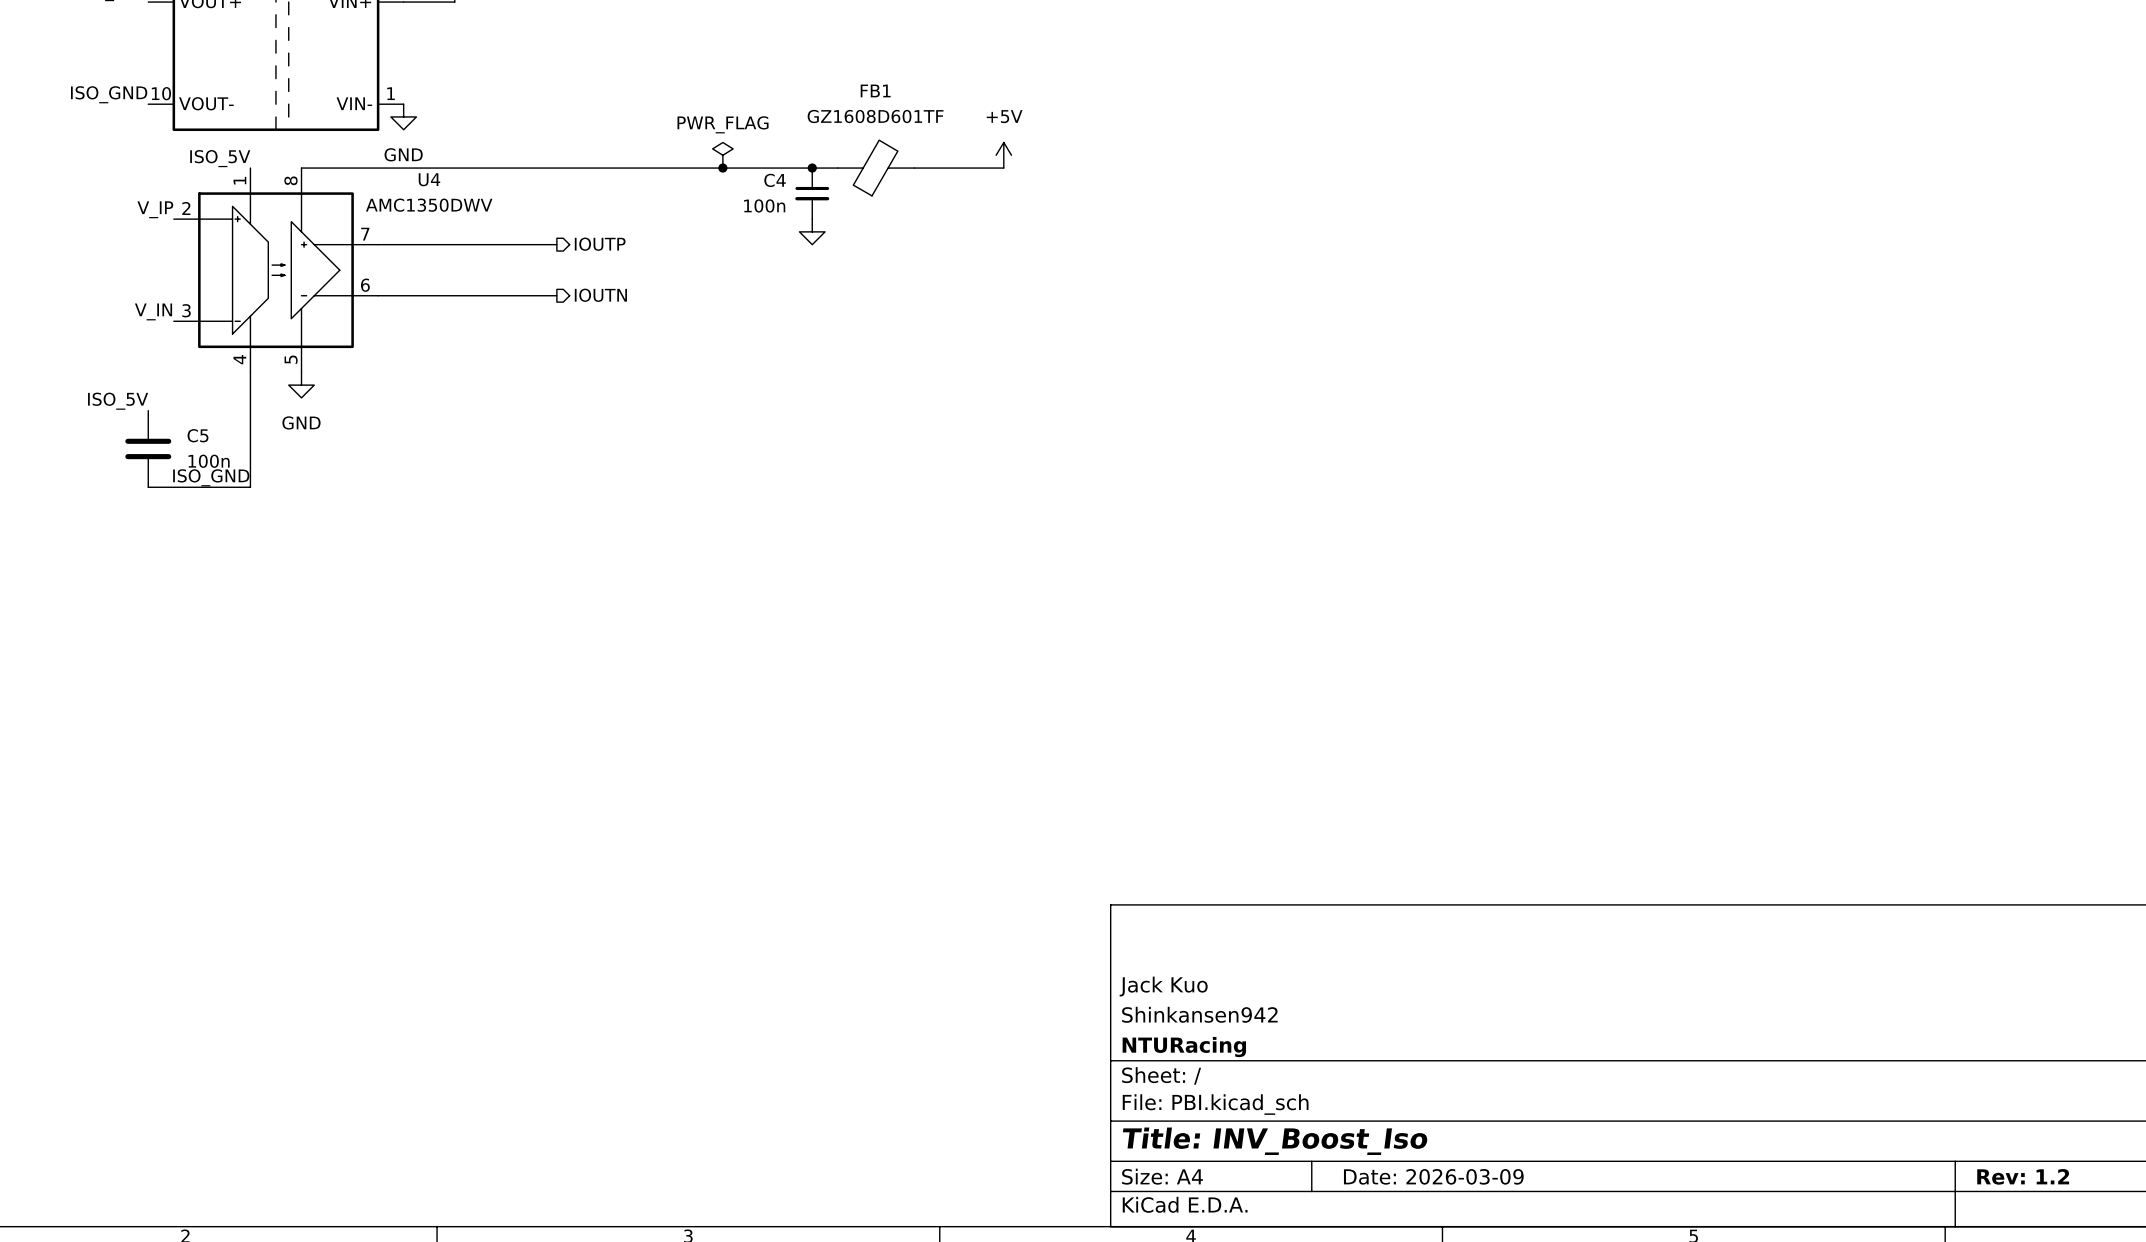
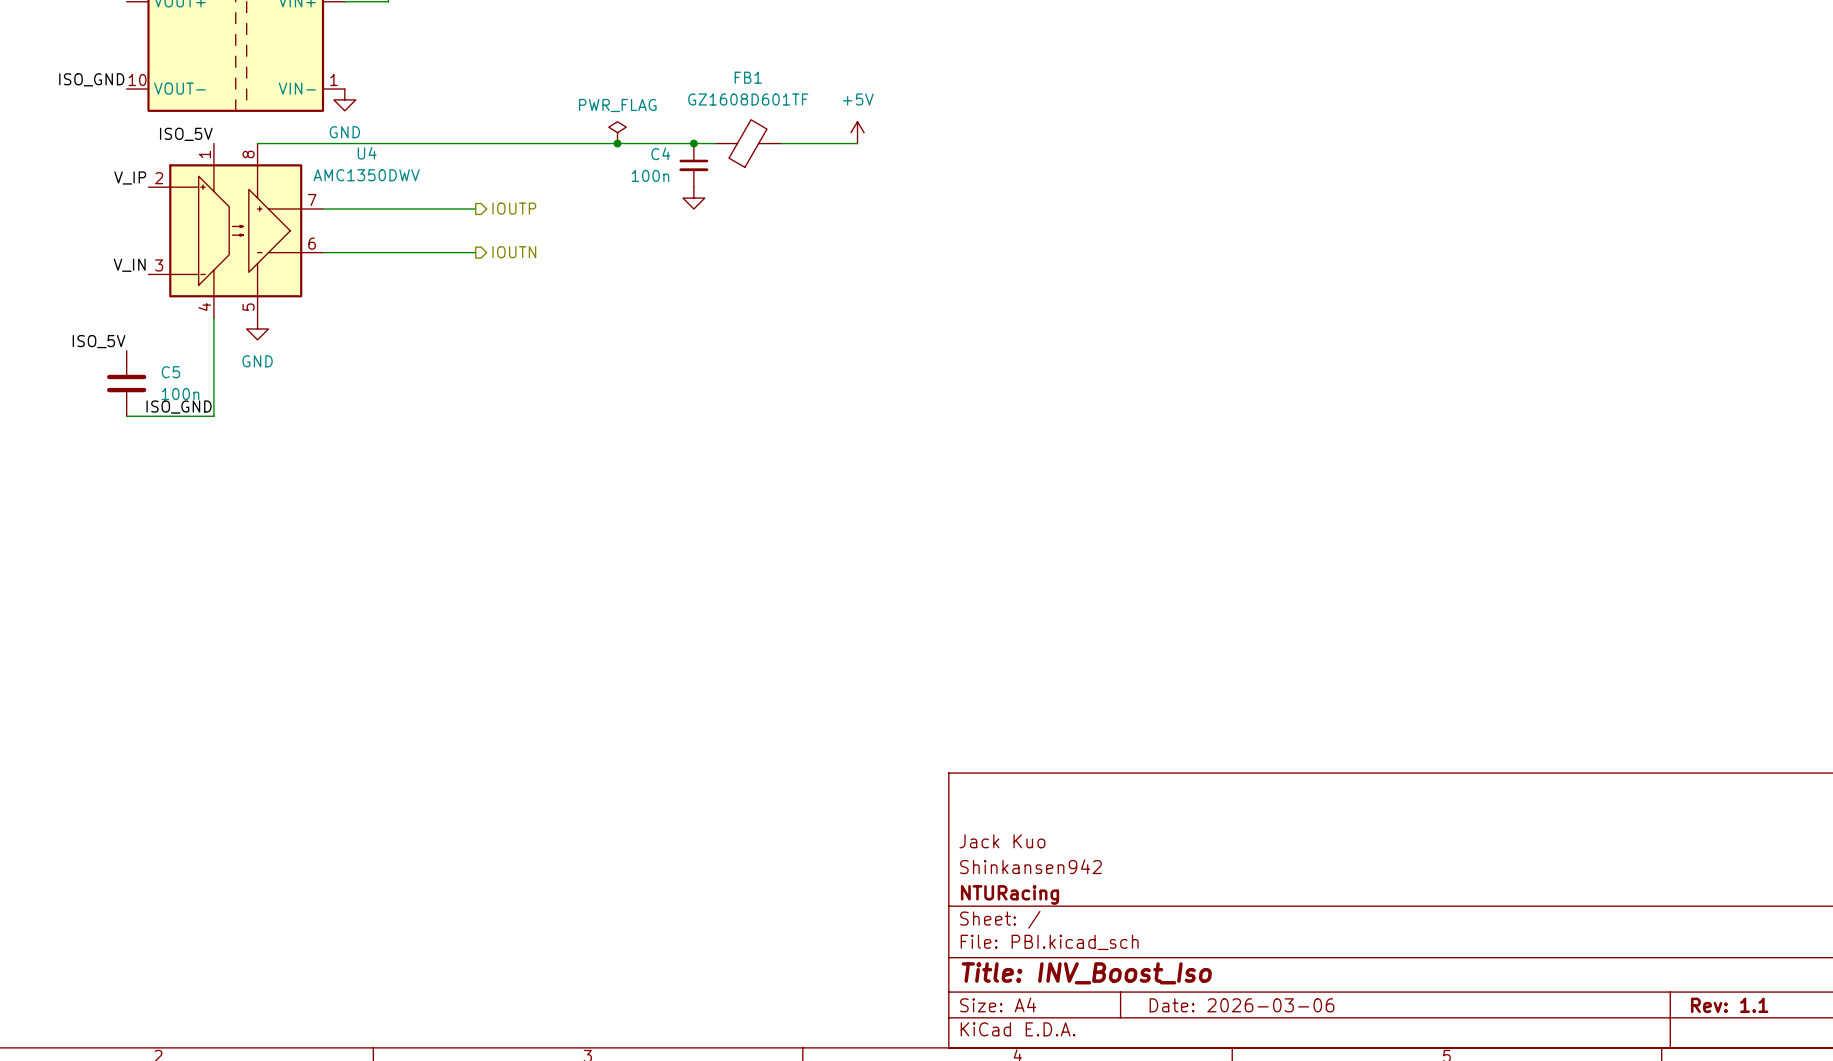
title block: Date: 2026-03-09 (1433, 1176) -> Date: 2026-03-06 (1242, 1005)
title block: Rev: 1.2 (2023, 1176) -> Rev: 1.1 (1729, 1005)

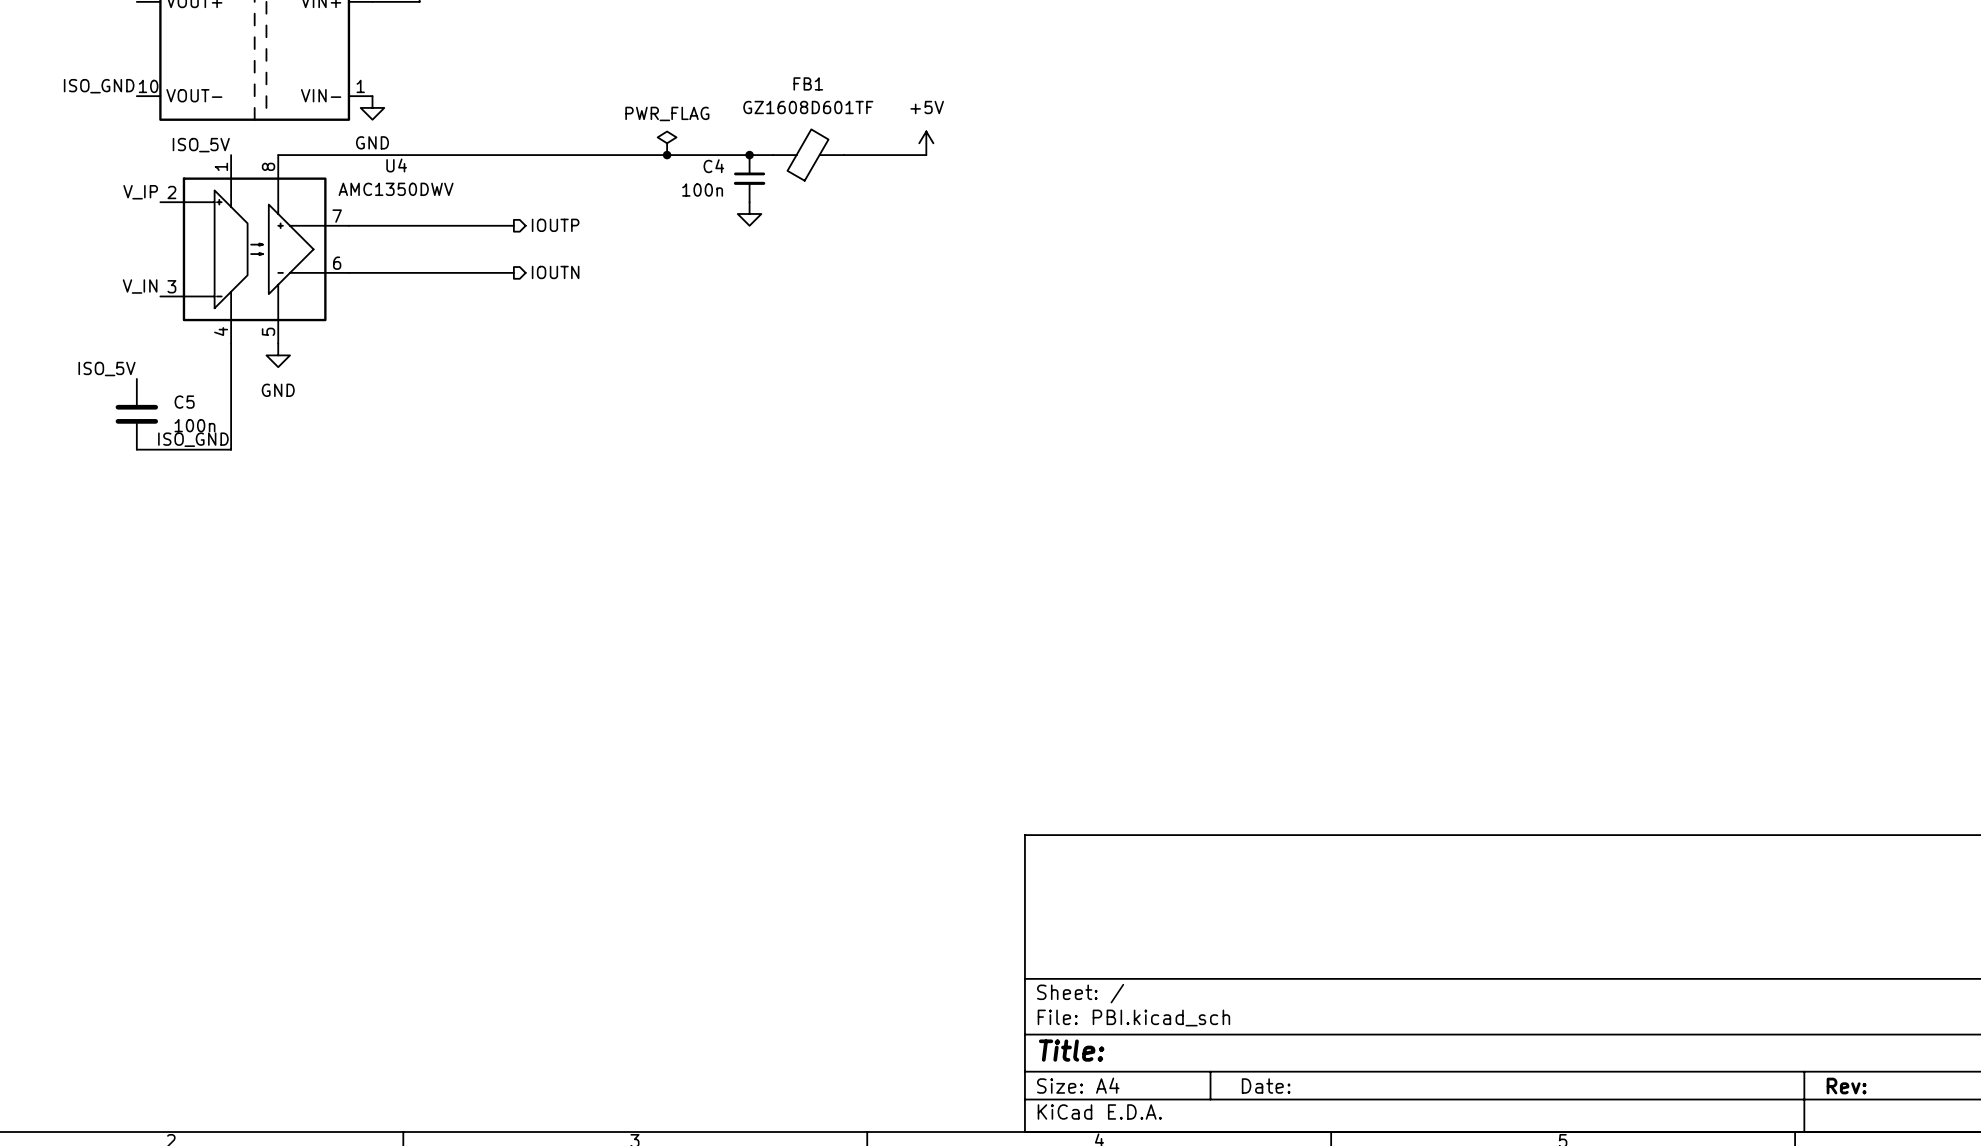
title block: Jack Kuo (1002, 841) -> none
title block: Shinkansen942 (1030, 866) -> none
title block: NTURacing (1010, 894) -> none
title block: Title: INV_Boost_Iso (1086, 973) -> Title: (1071, 1050)
title block: Date: 2026-03-06 (1242, 1005) -> Date: (1266, 1086)
title block: Rev: 1.1 (1729, 1005) -> Rev: (1846, 1086)

